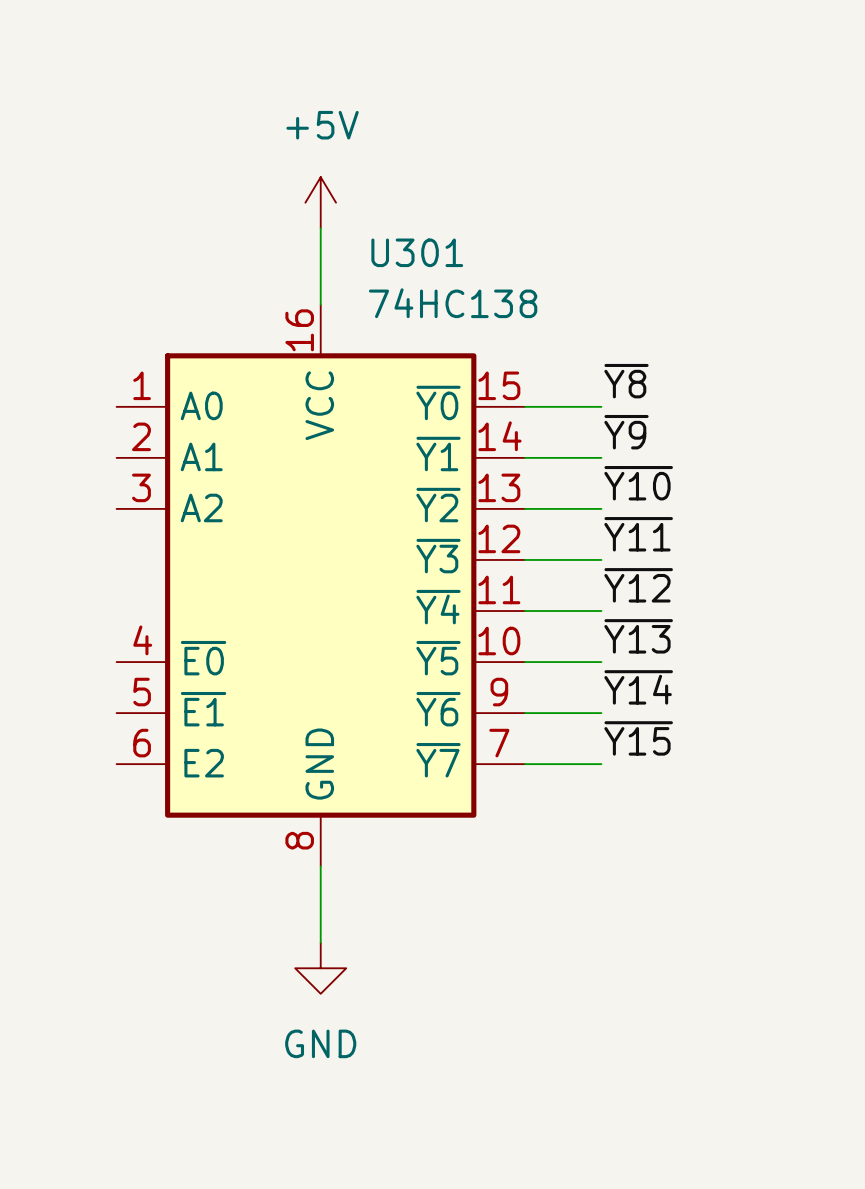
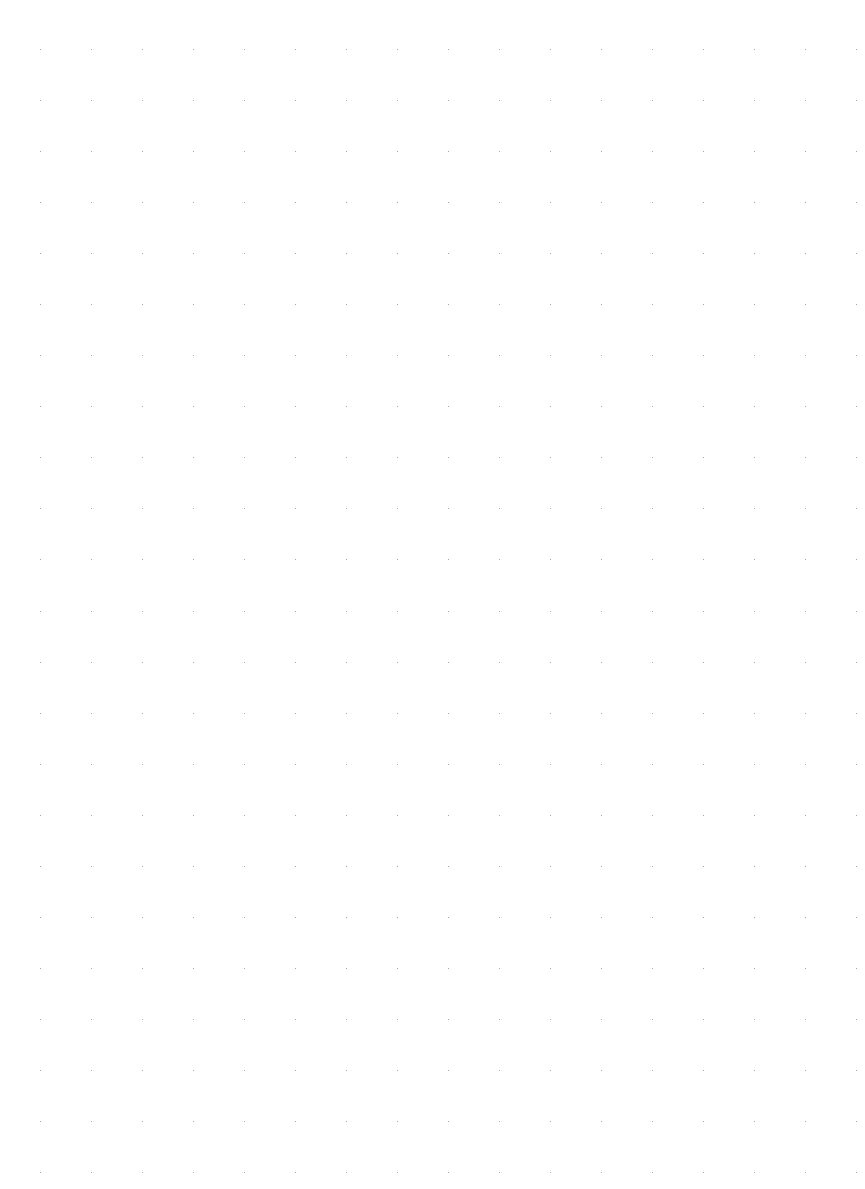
power symbol: +5V (320, 202) -> none
wire: (320, 228) (320, 304) -> none
label: ~{Y8} (626, 381) -> none
wire: (524, 406) (601, 406) -> none
label: ~{Y9} (626, 432) -> none
wire: (524, 457) (601, 457) -> none
label: ~{Y10} (638, 483) -> none
wire: (524, 508) (601, 508) -> none
label: ~{Y11} (638, 534) -> none
wire: (524, 559) (601, 559) -> none
U301: 74HC138 (320, 585) -> none
label: ~{Y12} (638, 585) -> none
wire: (524, 611) (601, 611) -> none
label: ~{Y13} (638, 636) -> none
wire: (524, 662) (601, 662) -> none
label: ~{Y14} (638, 687) -> none
wire: (524, 713) (601, 713) -> none
label: ~{Y15} (638, 738) -> none
wire: (524, 764) (601, 764) -> none
wire: (320, 866) (320, 942) -> none
power symbol: GND (320, 968) -> none

